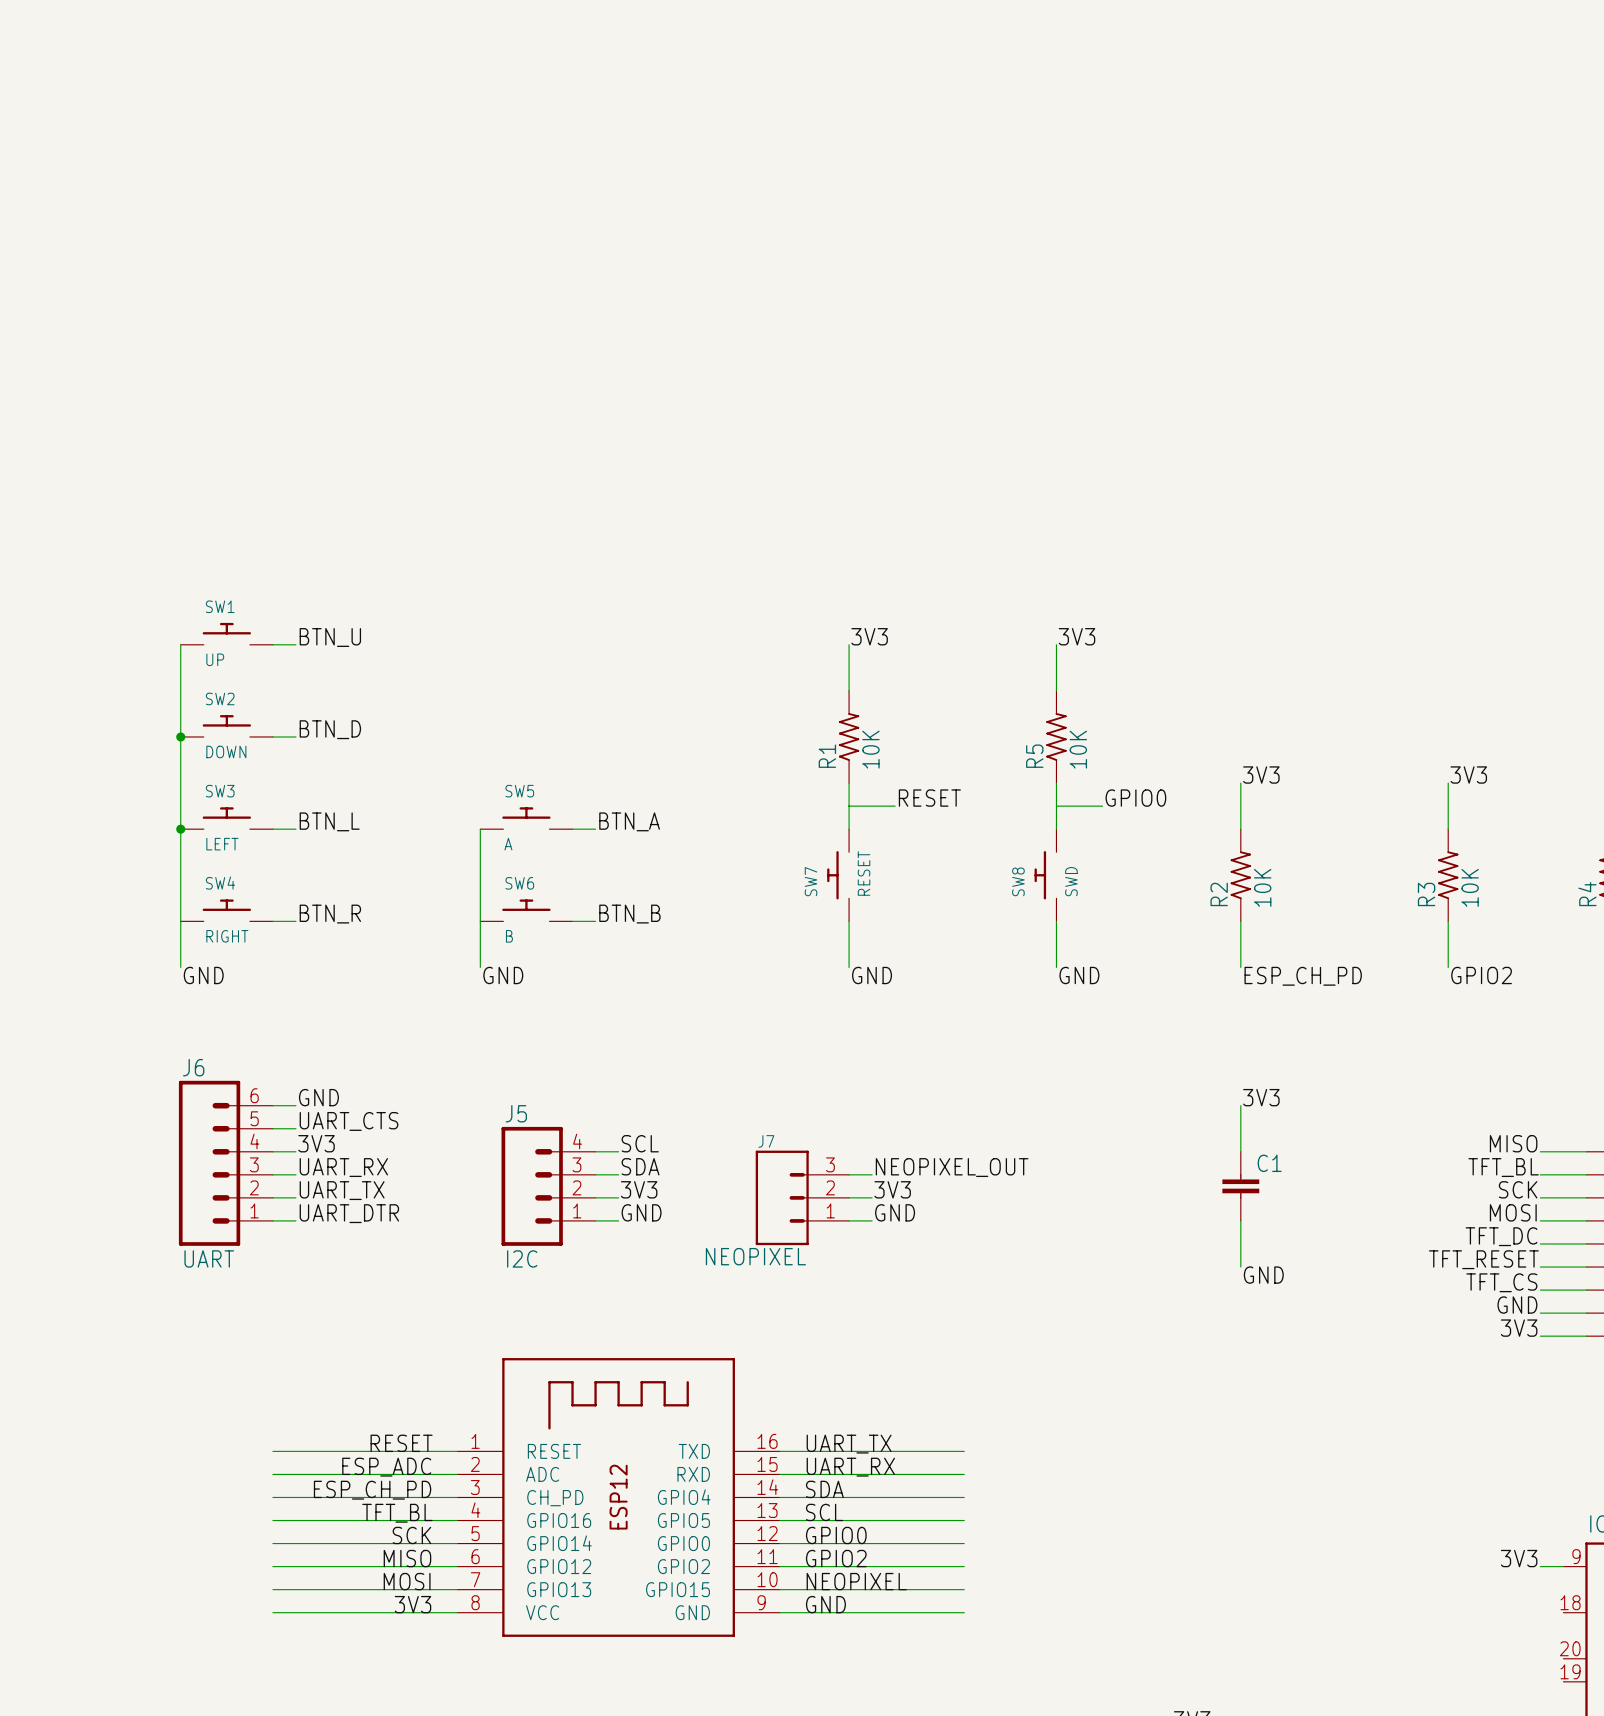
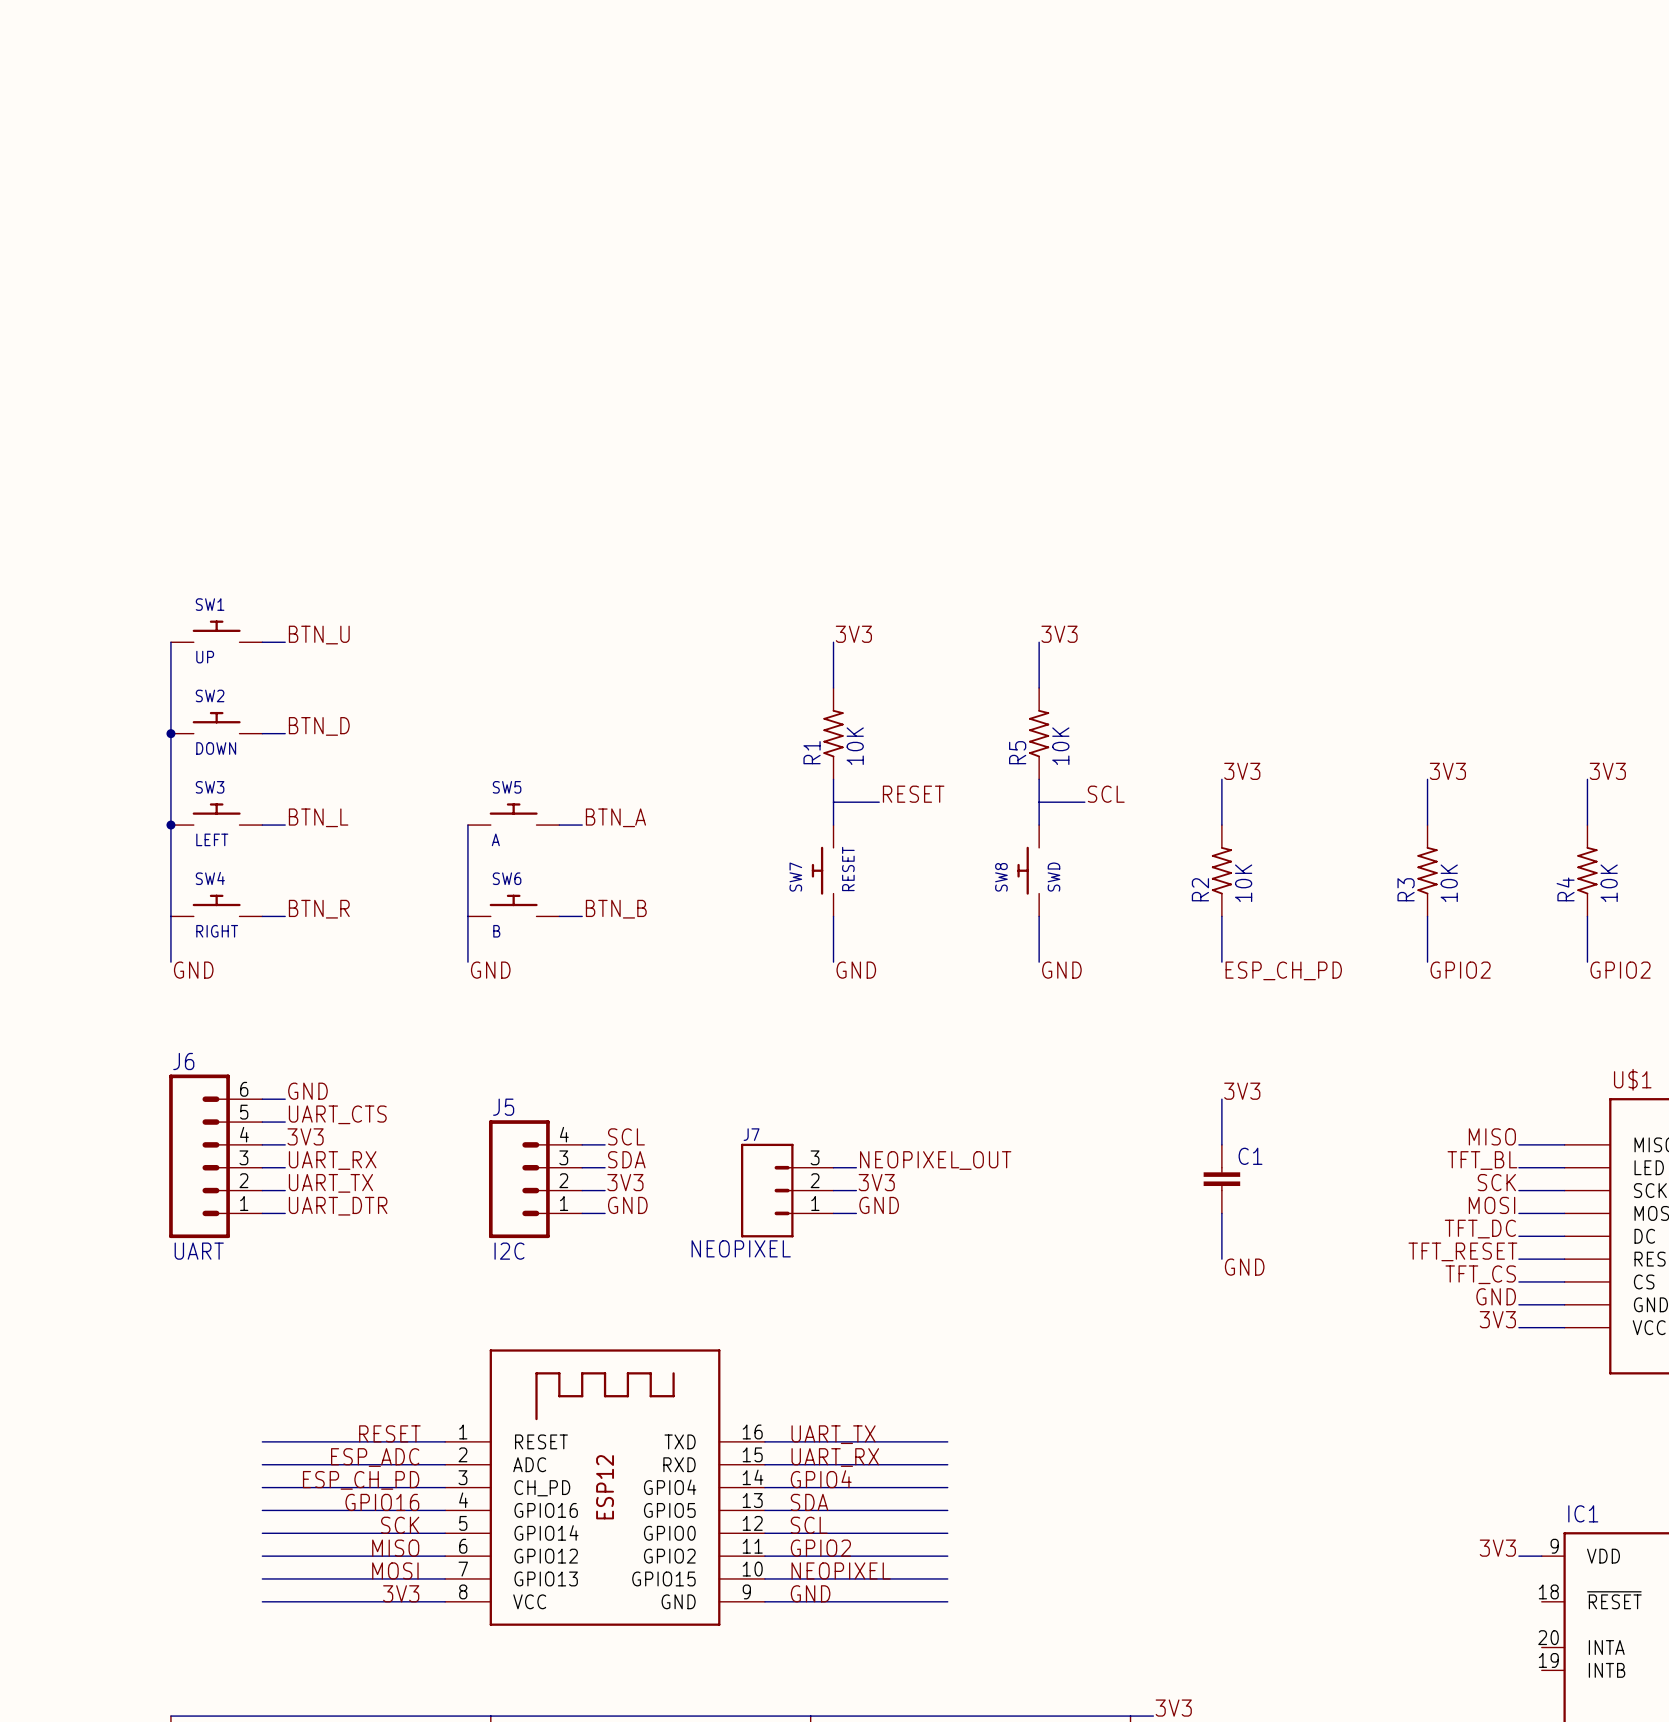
label: GPIO0 (1135, 798) -> SCL (1106, 794)
label: SDA (824, 1489) -> GPIO4 (821, 1479)
label: SCL (824, 1512) -> SDA (809, 1502)
label: TFT_BL (397, 1513) -> GPIO16 (382, 1502)
label: GPIO0 (836, 1535) -> SCL (809, 1525)

